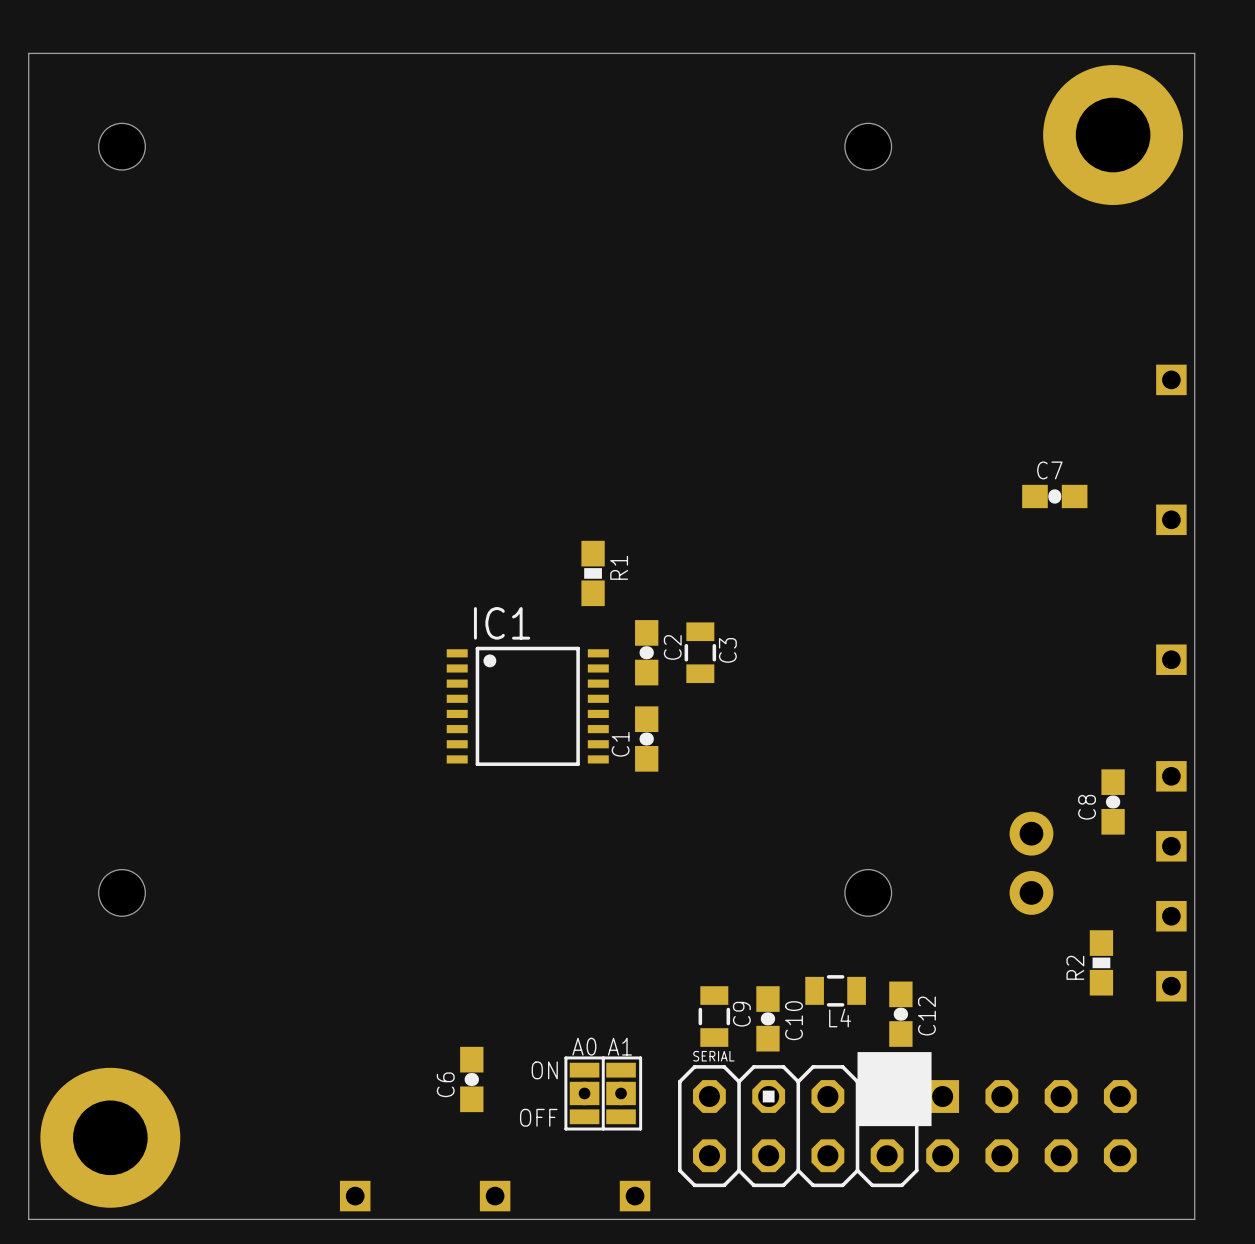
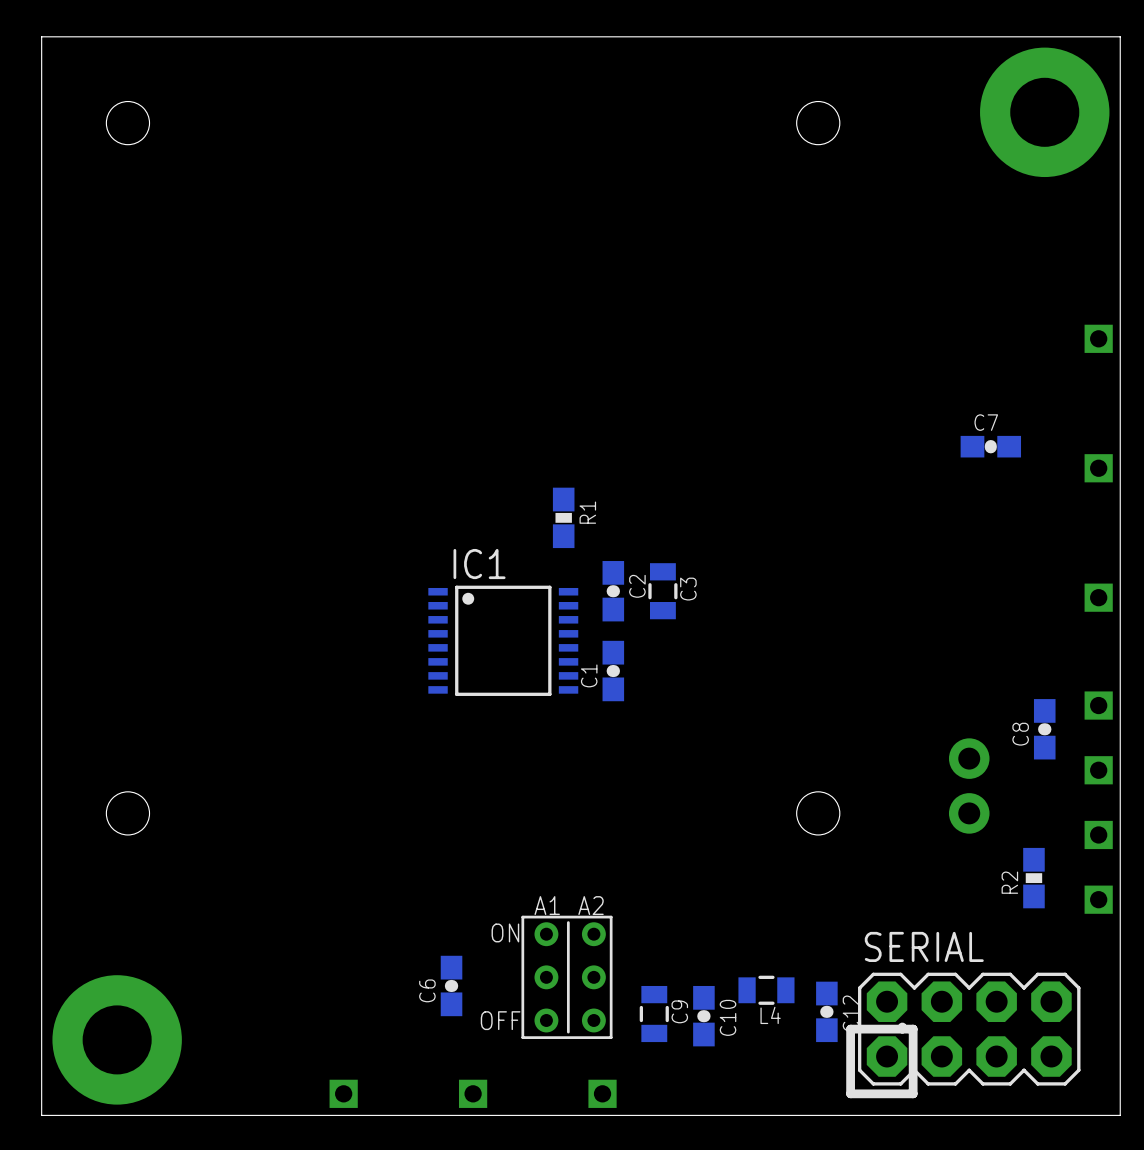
L4 position: (835, 990) -> (766, 990)
C12 position: (900, 1014) -> (826, 1011)
C9 position: (714, 1016) -> (654, 1014)
C10 position: (767, 1018) -> (703, 1016)
part: none -> (566, 977)
part: (603, 1093) -> none
SERIAL: (804, 1119) -> none
line: none -> (902, 1026) (902, 1029) (850, 1029) (850, 1093) (913, 1093) (913, 1029) (904, 1029)
part: (1031, 1126) -> none
SERIAL: none -> (969, 1029)

